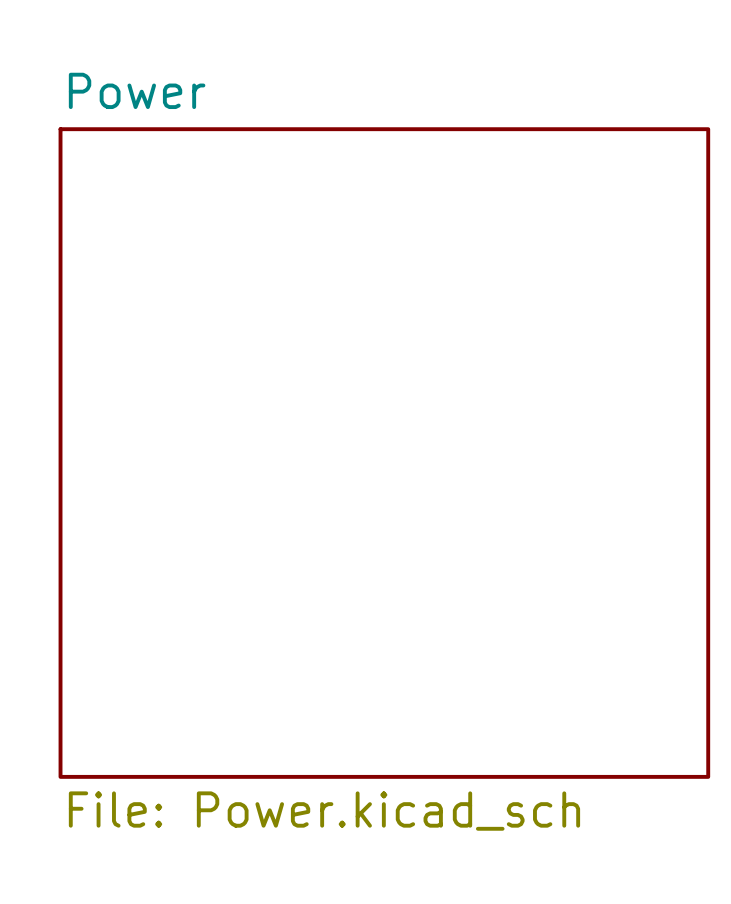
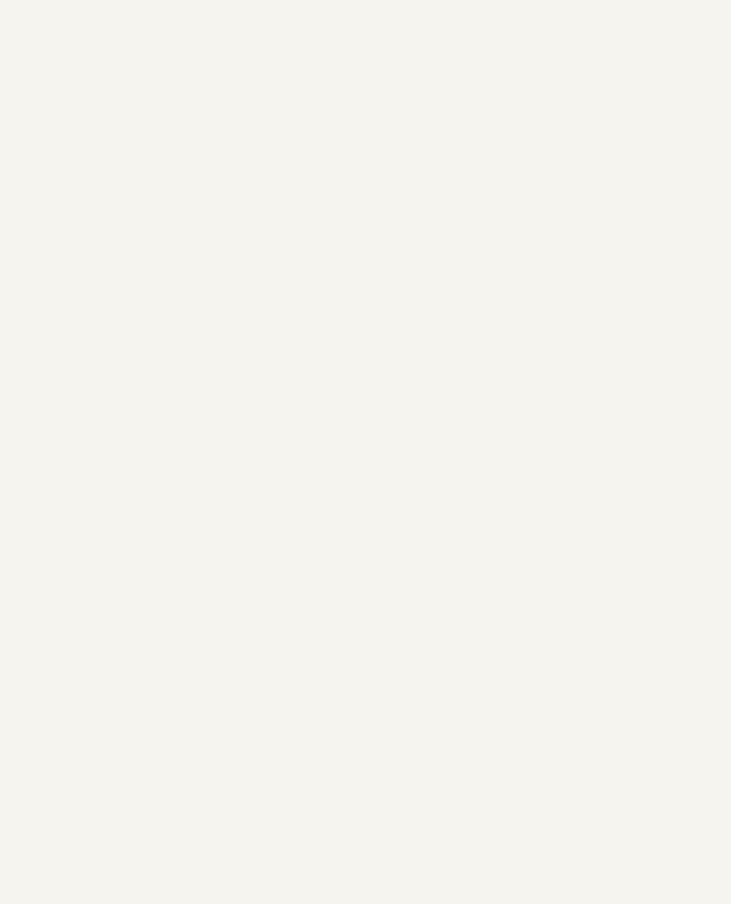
sheet Power: File: Power.kicad_sch (384, 453) -> none

